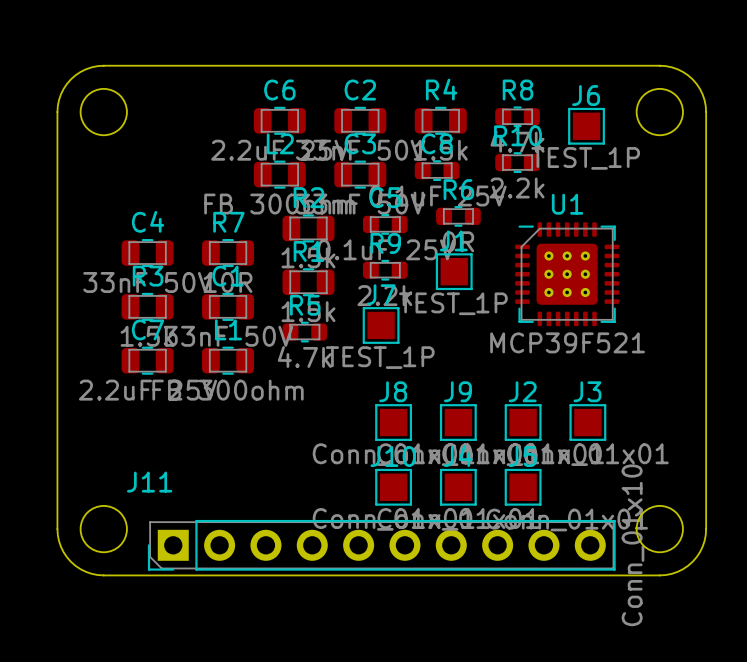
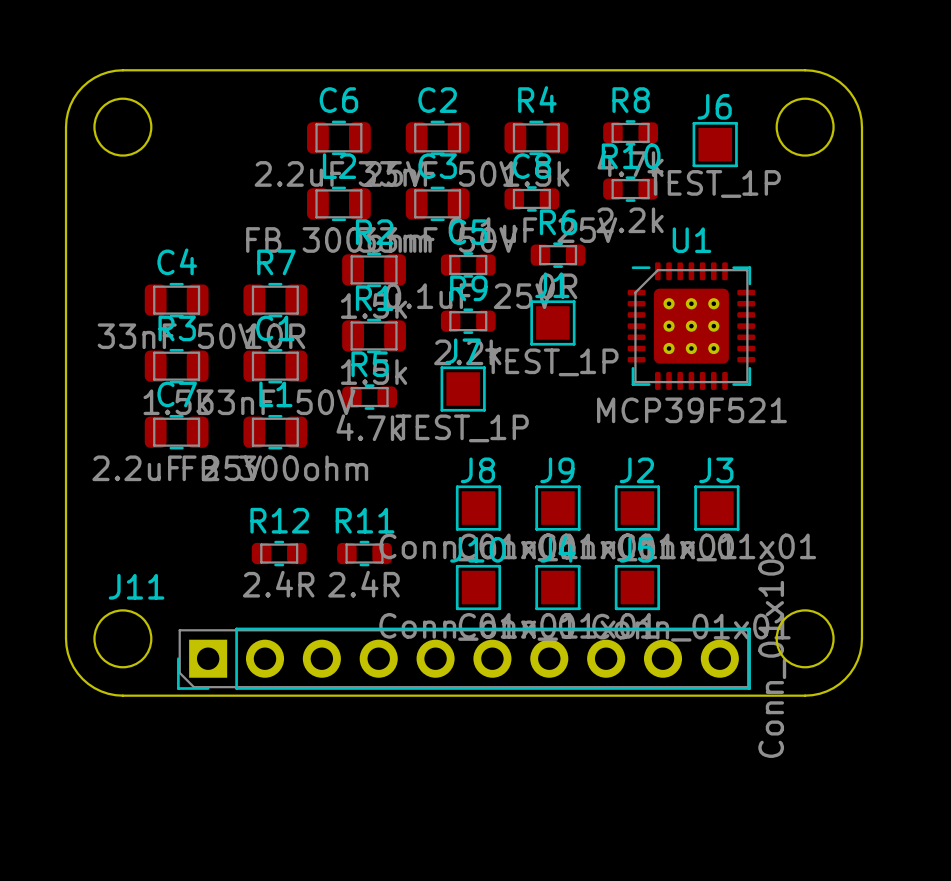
R12: none -> 2.4R (279, 553)
R11: none -> 2.4R (364, 553)
J11 name position: J11 (149, 482) -> J11 (136, 586)

